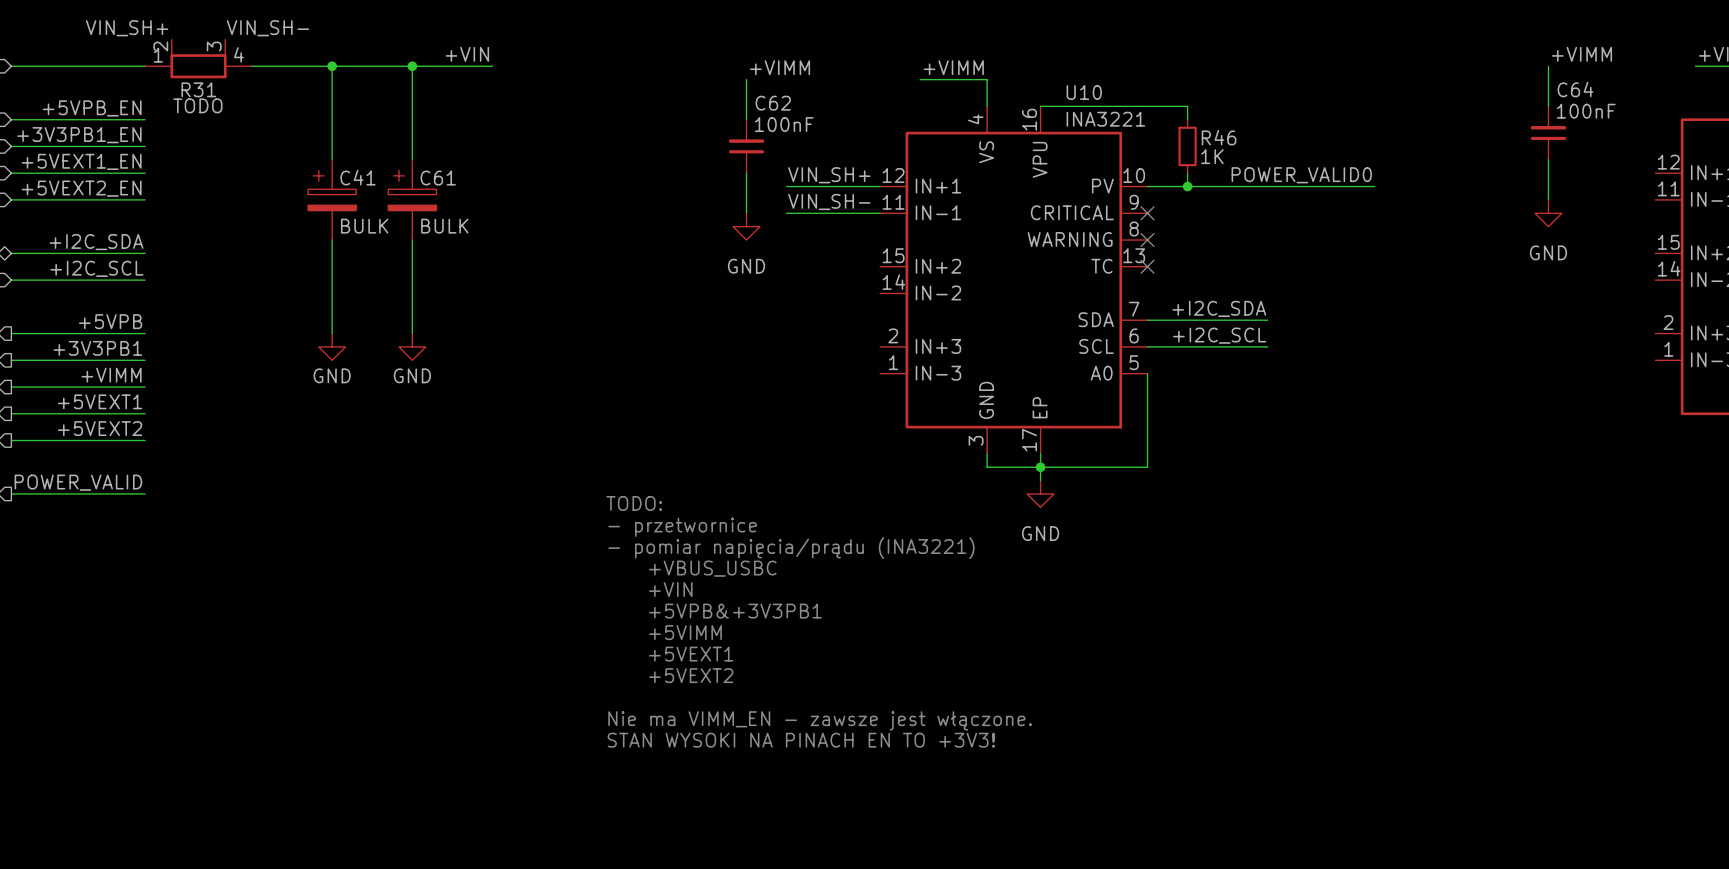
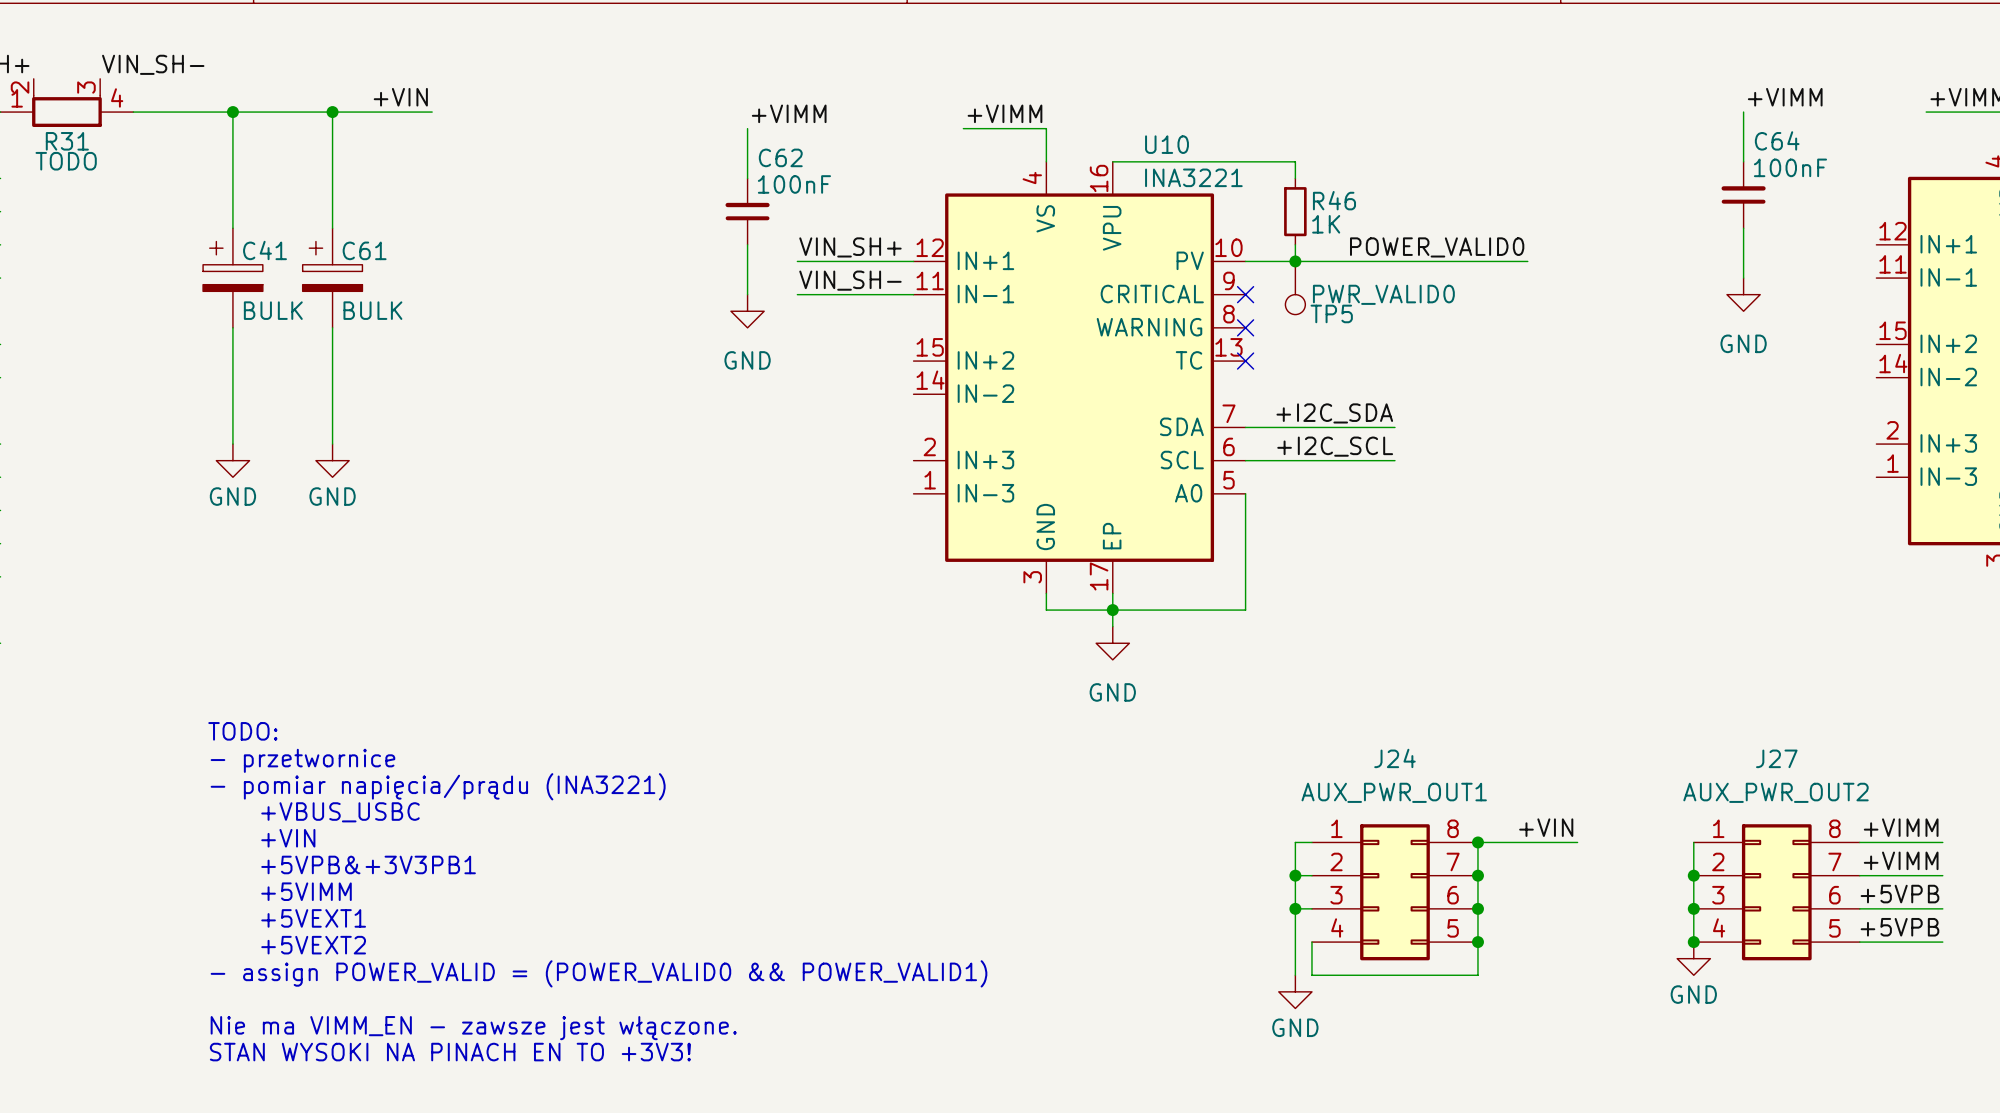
TP5: none -> PWR_VALID0 (1295, 288)
text: TODO: (634, 503) -> none
text: - przetwornice (682, 527) -> none
text: - pomiar napięcia/prądu (INA3221) (791, 548) -> none
text: none -> TODO: (242, 731)
text: +VBUS_USBC (712, 568) -> none
text: none -> - przetwornice (302, 760)
text: +VIN (670, 589) -> none
text: none -> - pomiar napięcia/prądu (INA3221) (438, 786)
text: +5VPB&+3V3PB1 (735, 611) -> none
text: none -> +VBUS_USBC (340, 812)
text: +5VIMM (685, 632) -> none
label: none -> +VIN (1546, 827)
label: none -> +VIMM (1901, 827)
text: none -> +VIN (288, 838)
text: +5VEXT1 (691, 654) -> none
wire: none -> (1311, 842) (1295, 842) (1295, 975)
junction: none -> (1477, 842)
wire: none -> (1577, 842) (1477, 842) (1477, 975) (1311, 975) (1311, 942)
wire: none -> (1693, 842) (1693, 942)
wire: none -> (1859, 842) (1942, 842)
label: none -> +VIMM (1901, 860)
text: none -> +5VPB&+3V3PB1 (368, 864)
text: +5VEXT2 (691, 675) -> none
wire: none -> (1295, 875) (1311, 875)
junction: none -> (1295, 875)
junction: none -> (1477, 875)
junction: none -> (1693, 875)
wire: none -> (1859, 875) (1942, 875)
text: none -> +5VIMM (306, 891)
J24: none -> AUX_PWR_OUT1 (1394, 892)
J27: none -> AUX_PWR_OUT2 (1776, 892)
label: none -> +5VPB (1899, 894)
wire: none -> (1295, 908) (1311, 908)
junction: none -> (1295, 908)
junction: none -> (1477, 908)
junction: none -> (1693, 908)
wire: none -> (1859, 908) (1942, 908)
text: none -> +5VEXT1 (313, 918)
text: Nie ma VIMM_EN - zawsze jest włączone. (820, 720) -> none
label: none -> +5VPB (1899, 927)
junction: none -> (1477, 942)
junction: none -> (1693, 942)
wire: none -> (1859, 942) (1942, 942)
text: none -> +5VEXT2 (313, 945)
text: STAN WYSOKI NA PINACH EN TO +3V3! (801, 740) -> none
power symbol: none -> GND (1693, 958)
text: none -> - assign POWER_VALID = (POWER_VALID0 && POWER_VALID1) (598, 973)
power symbol: none -> GND (1295, 991)
text: none -> Nie ma VIMM_EN - zawsze jest włączone. (473, 1028)
text: none -> STAN WYSOKI NA PINACH EN TO +3V3! (450, 1052)

